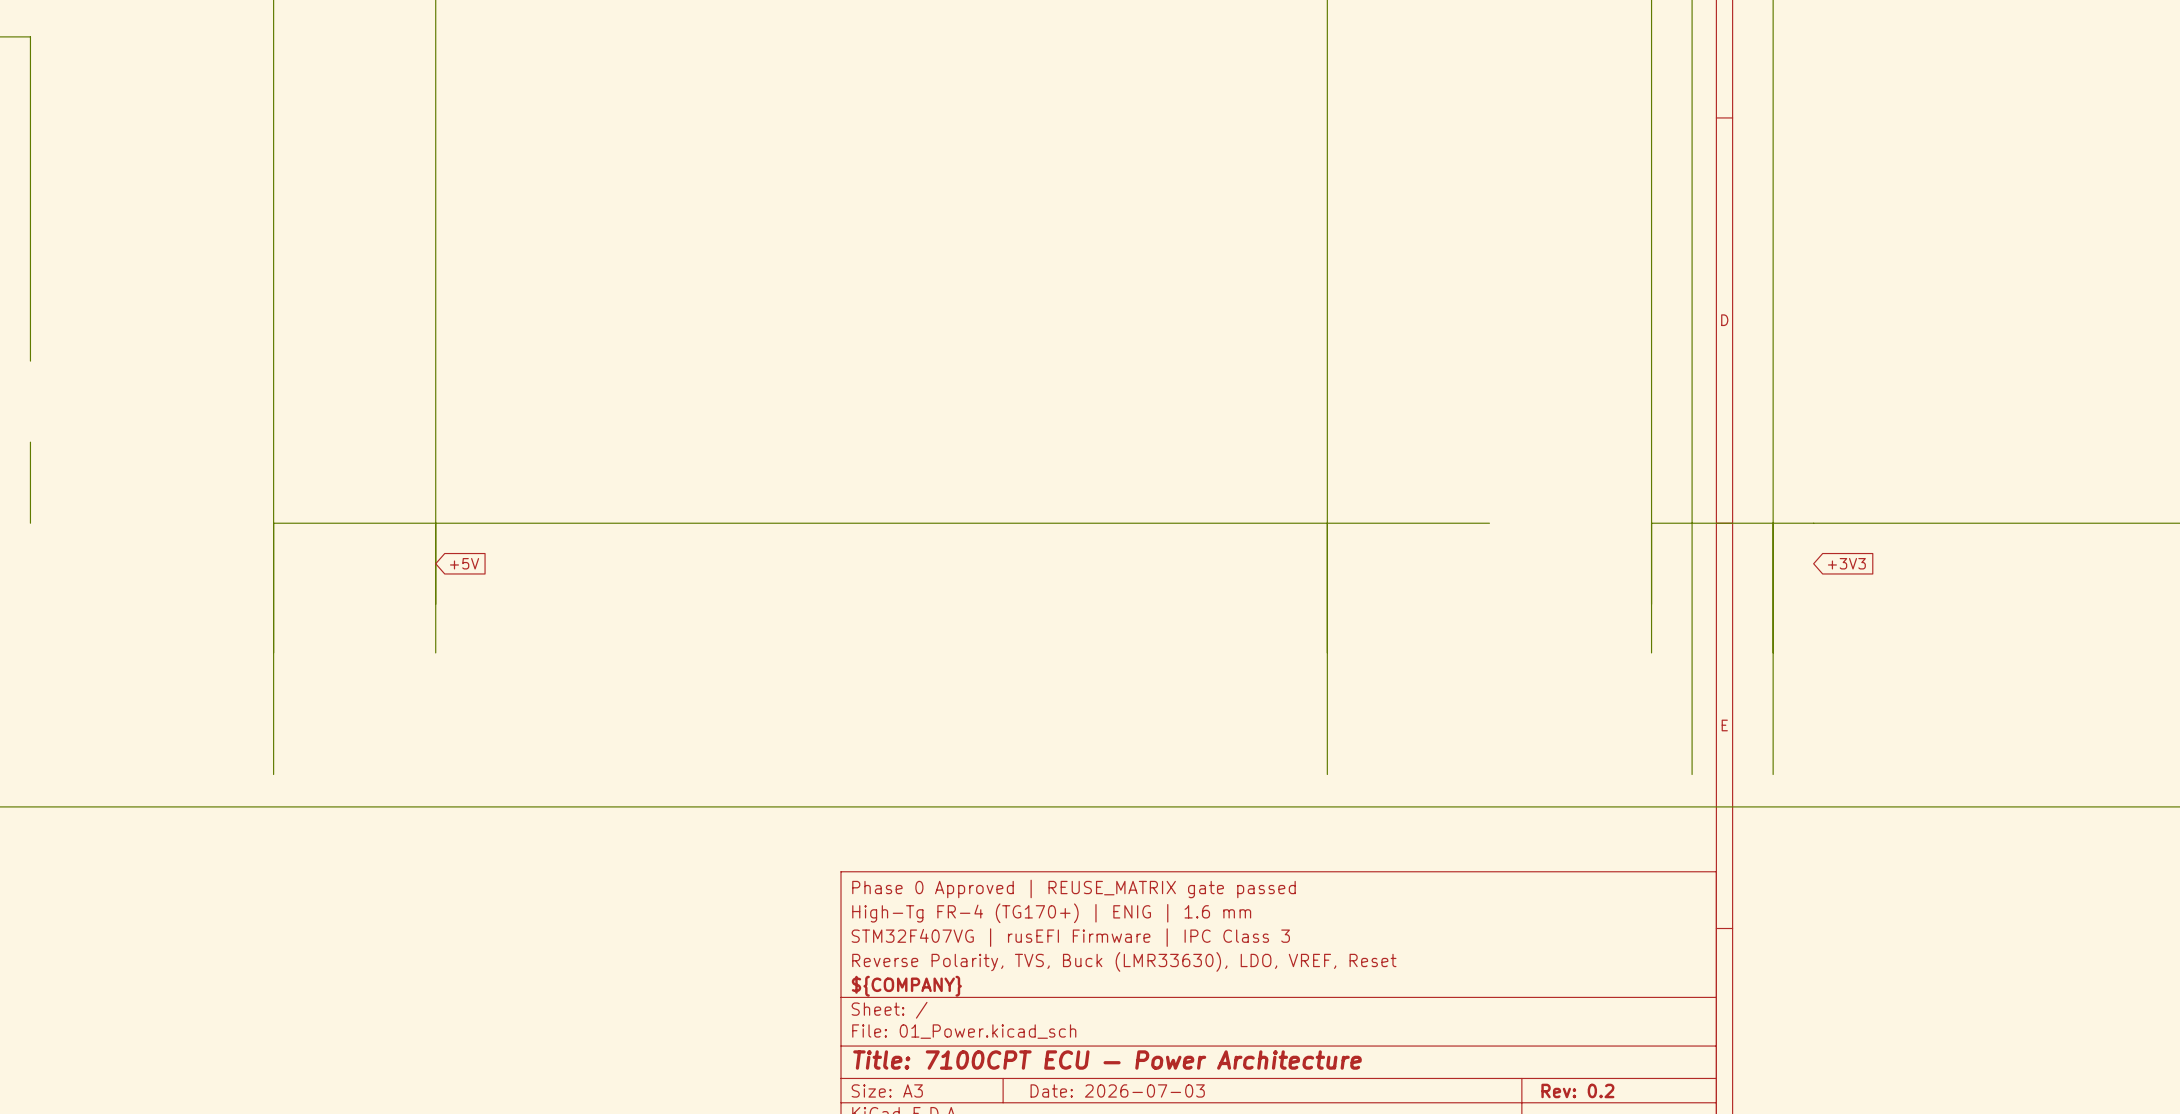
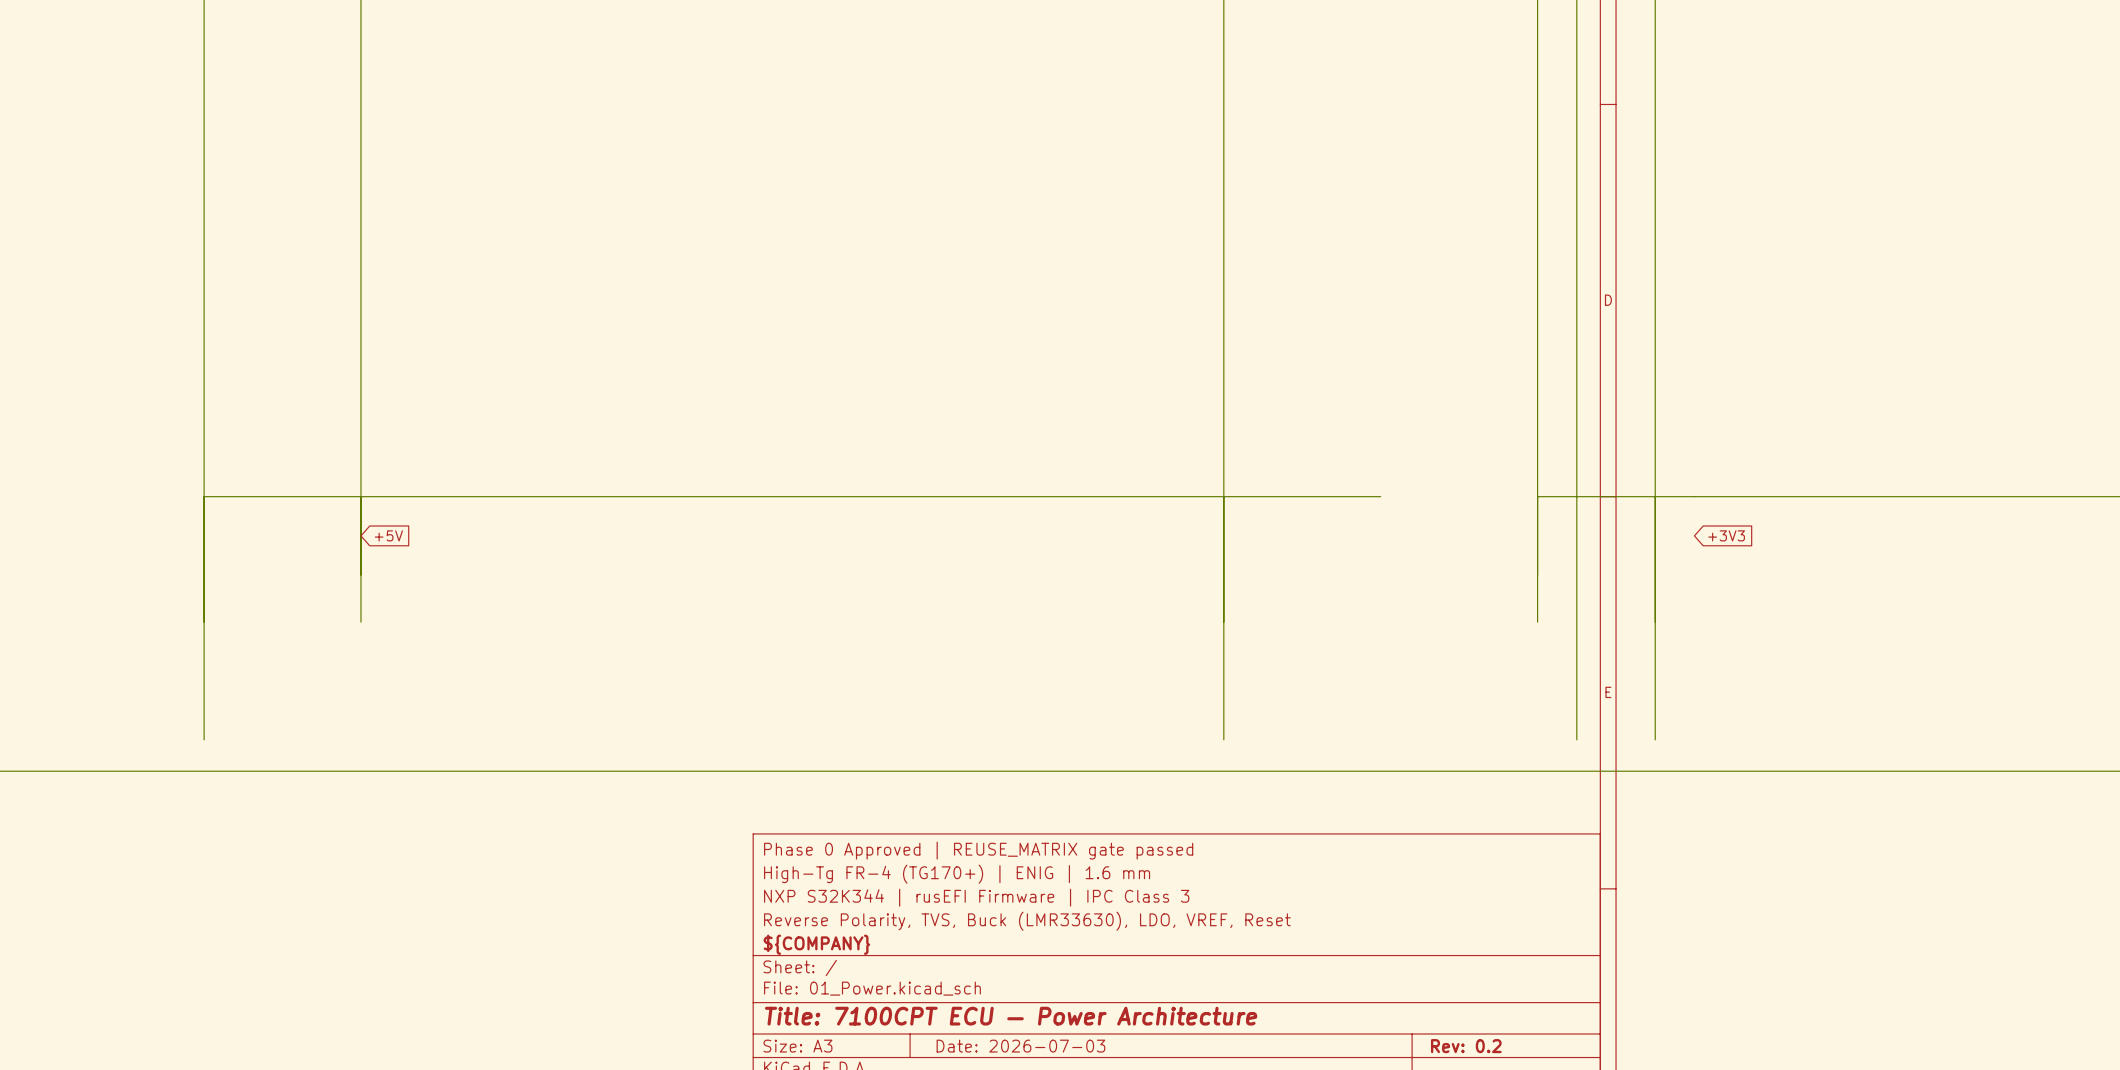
title block: STM32F407VG | rusEFI Firmware | IPC Class 3 (1070, 937) -> NXP S32K344 | rusEFI Firmware | IPC Class 3 (976, 897)

